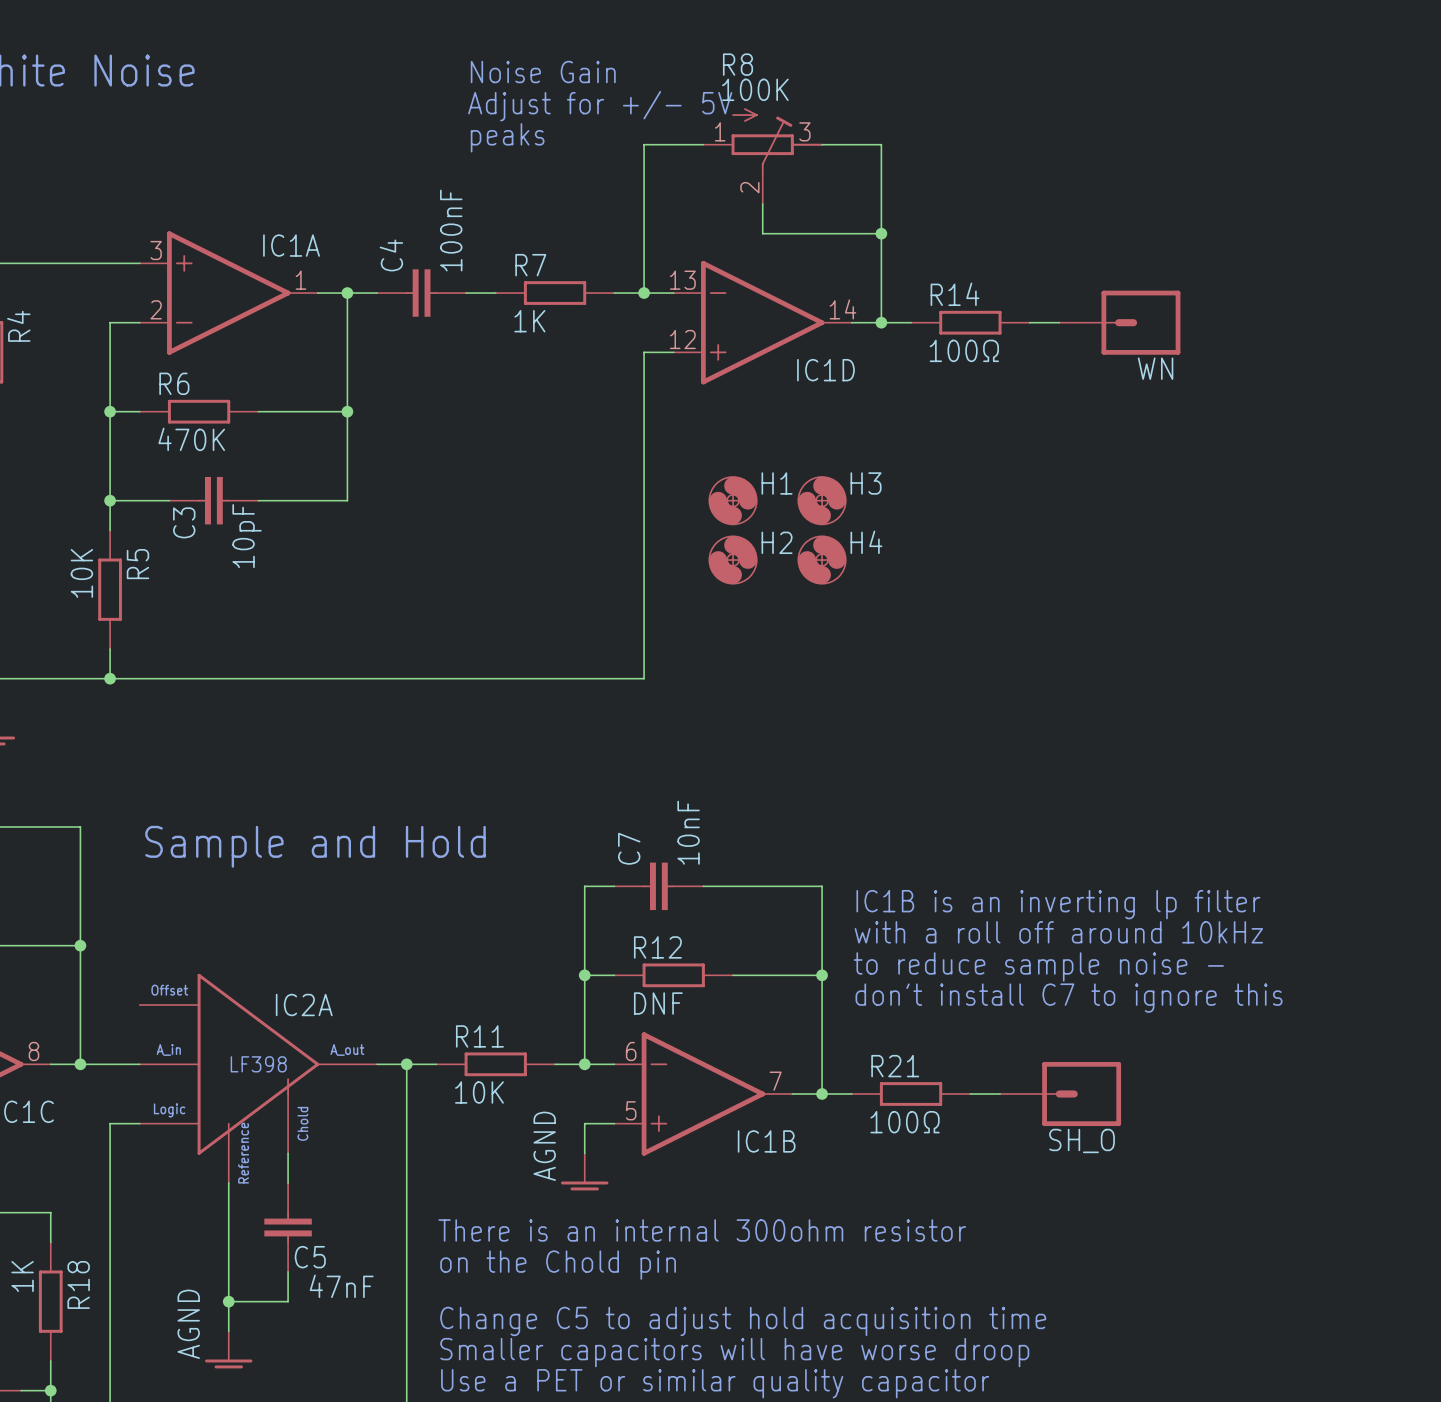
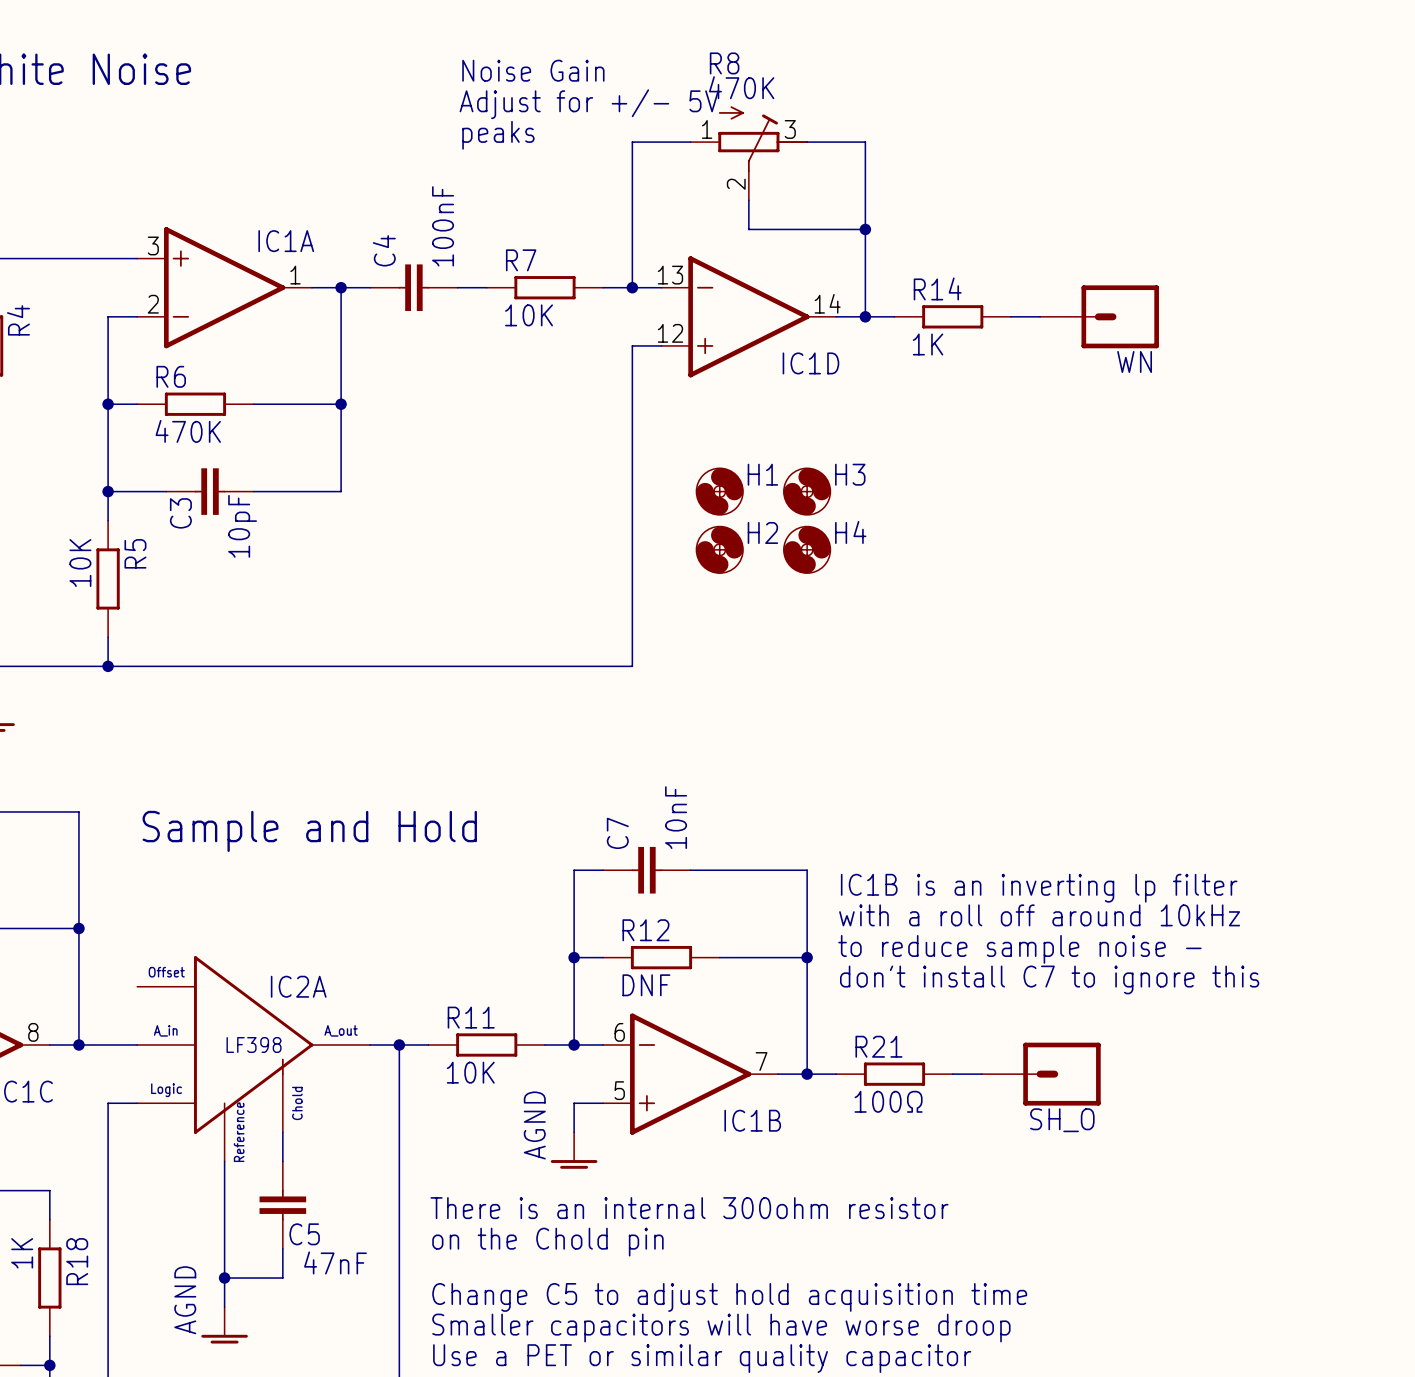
R8 value: 100K (755, 89) -> 470K (741, 87)
R7 value: 1K (529, 321) -> 10K (529, 315)
R14 value: 100Ω (964, 350) -> 1K (928, 344)

